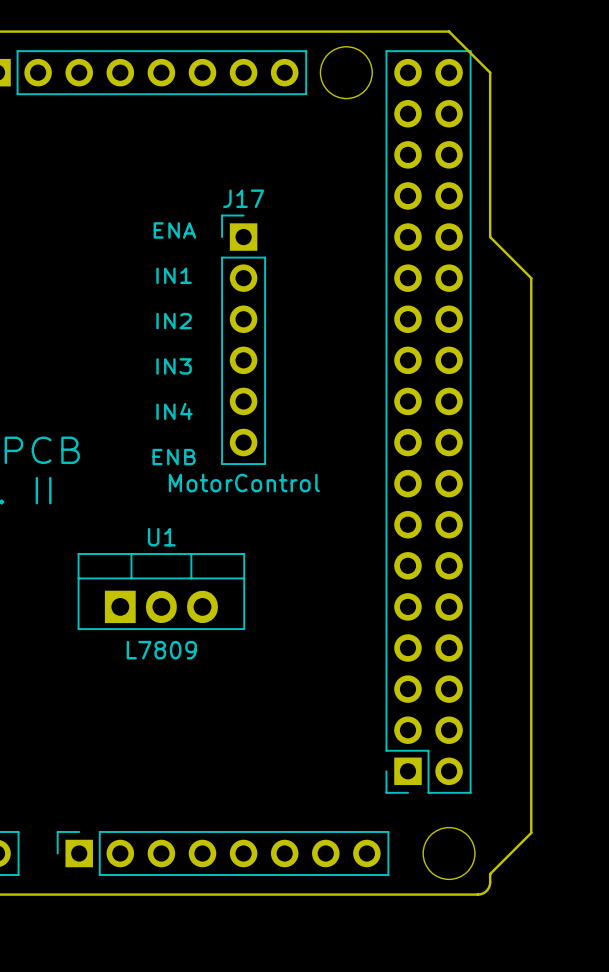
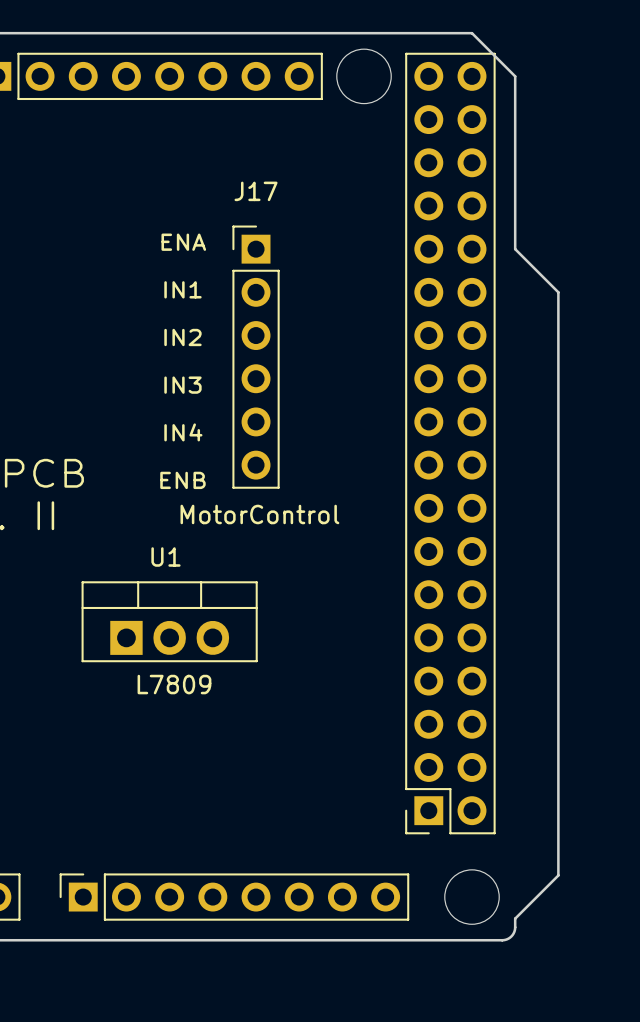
J17 name: J17 (243, 198) -> MotorControl (259, 514)
J17 value: MotorControl (244, 483) -> J17 (256, 191)
U1 name: U1 (161, 537) -> L7809 (174, 684)
U1 value: L7809 (161, 650) -> U1 (165, 557)

